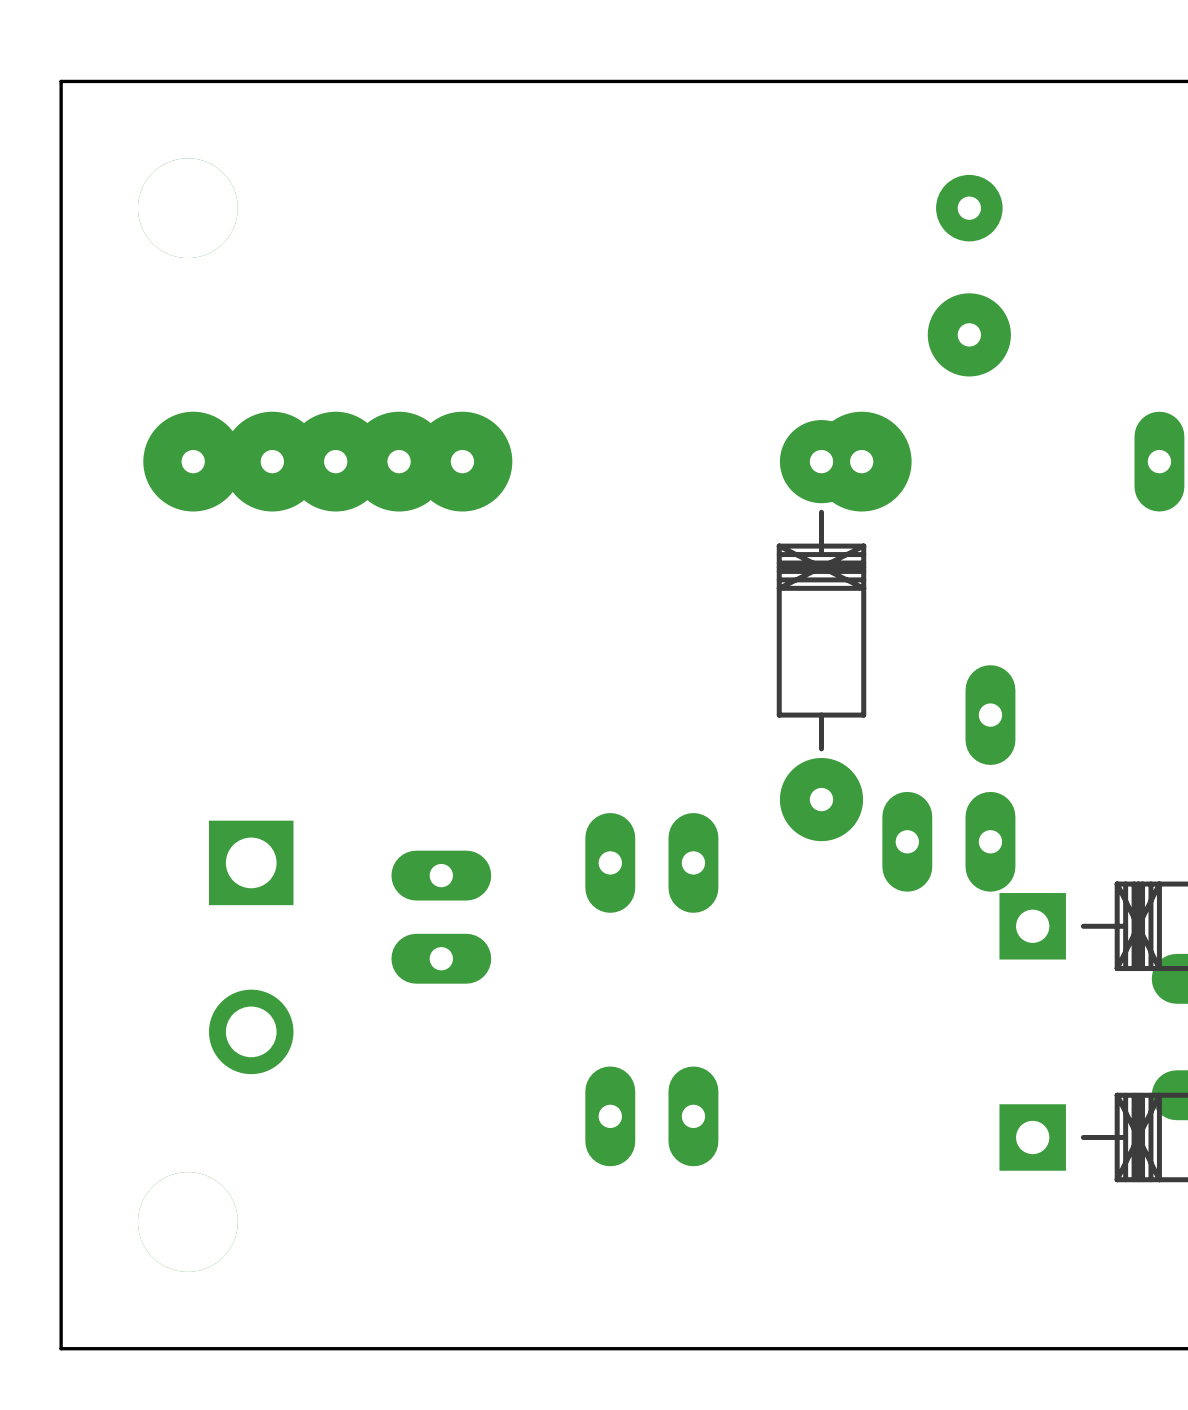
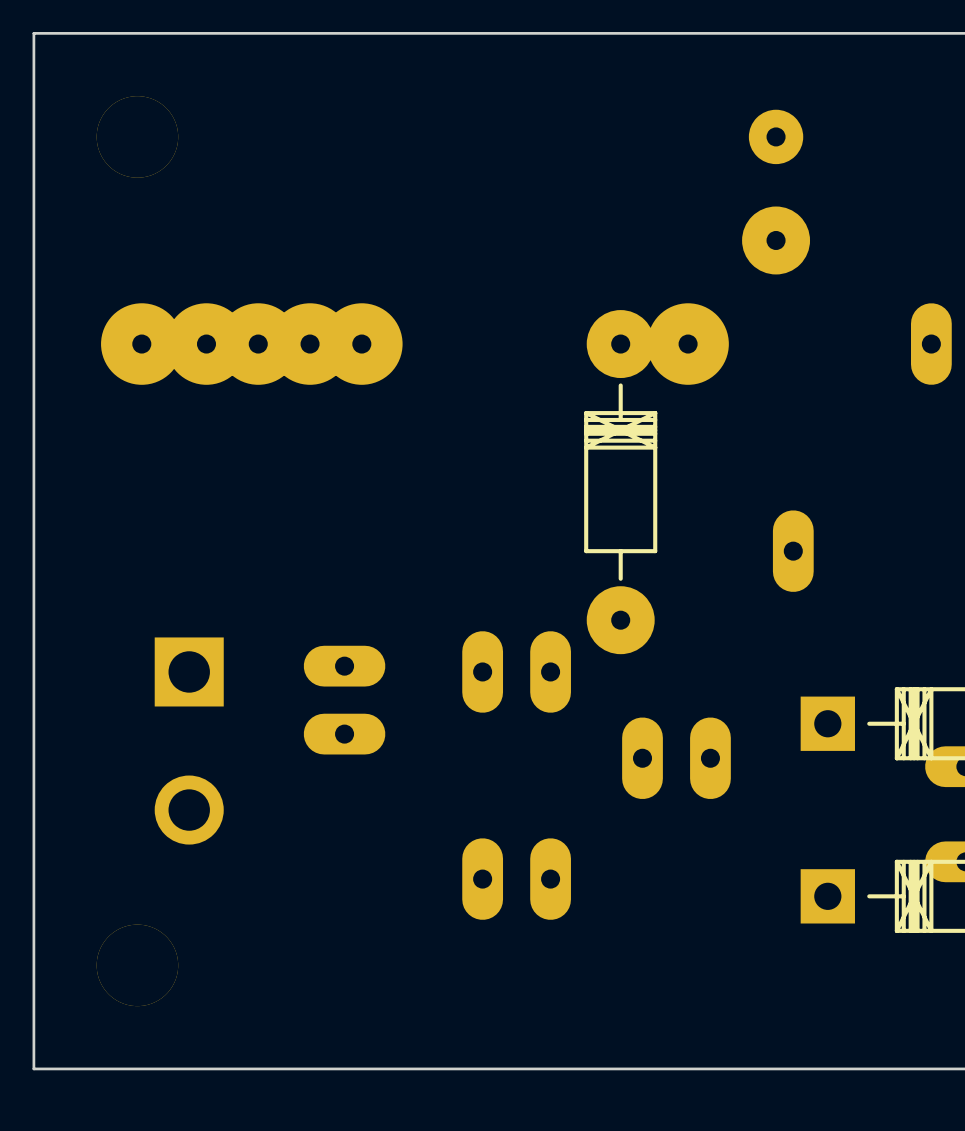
part position: (821, 630) -> (620, 482)
part position: (948, 841) -> (676, 758)
part position: (441, 917) -> (344, 700)

